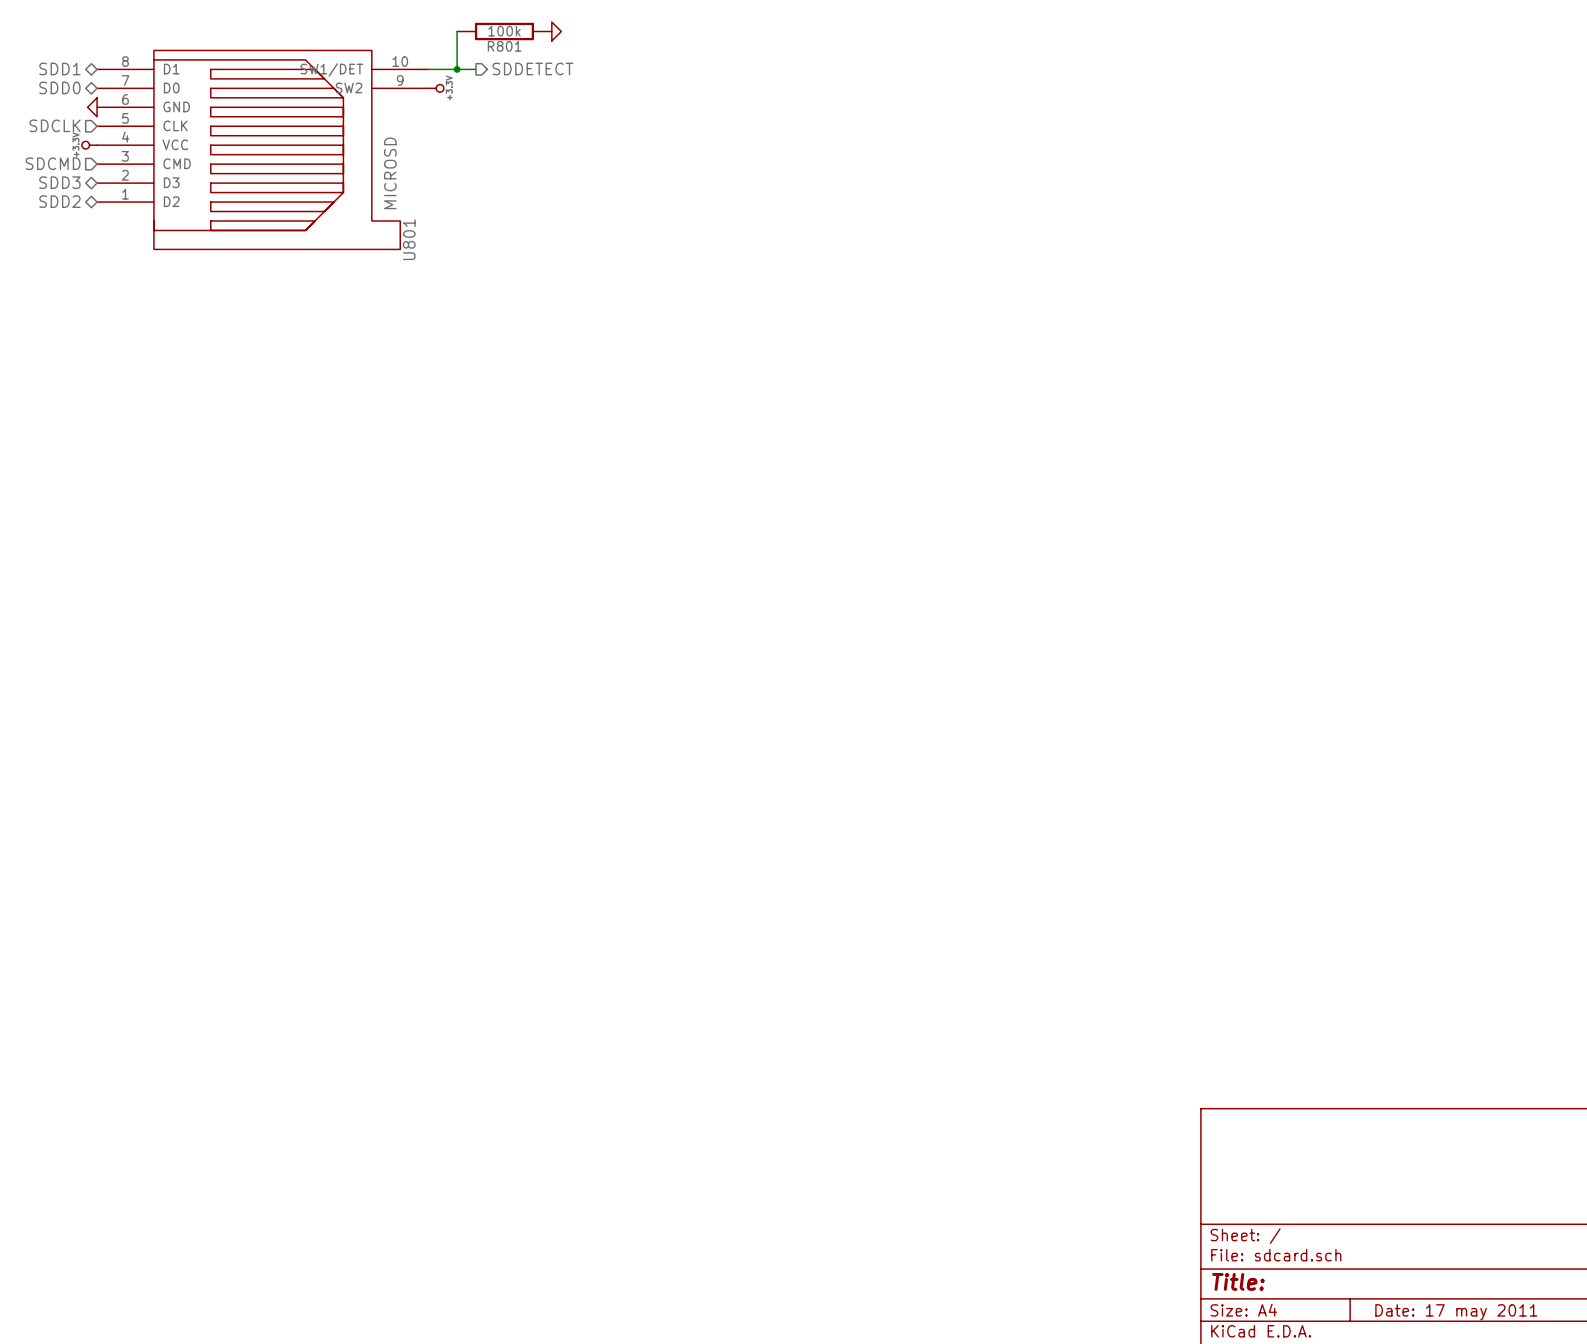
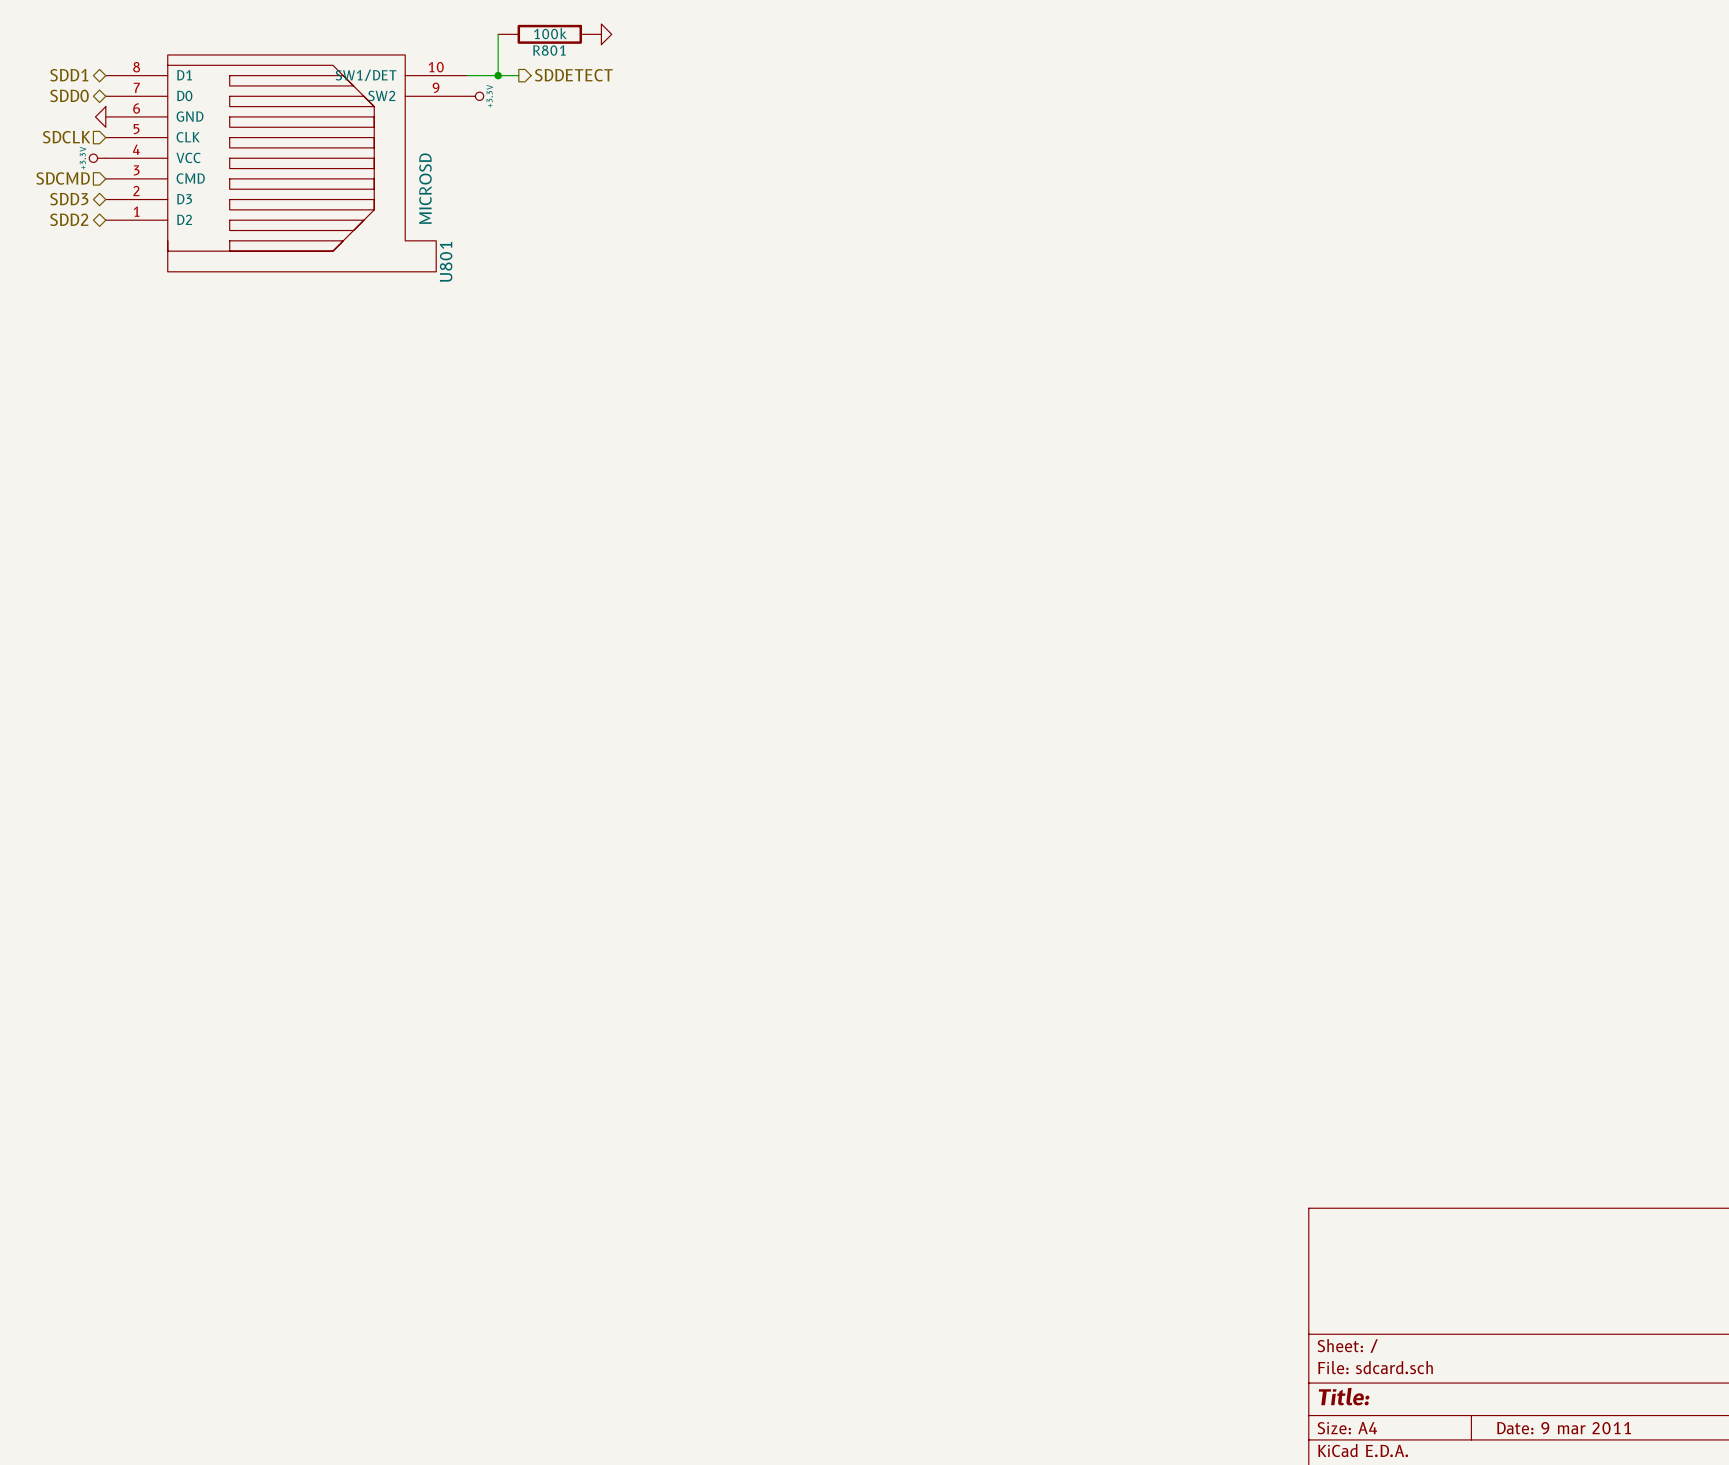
title block: Date: 17 may 2011 (1456, 1312) -> Date: 9 mar 2011 (1564, 1428)

